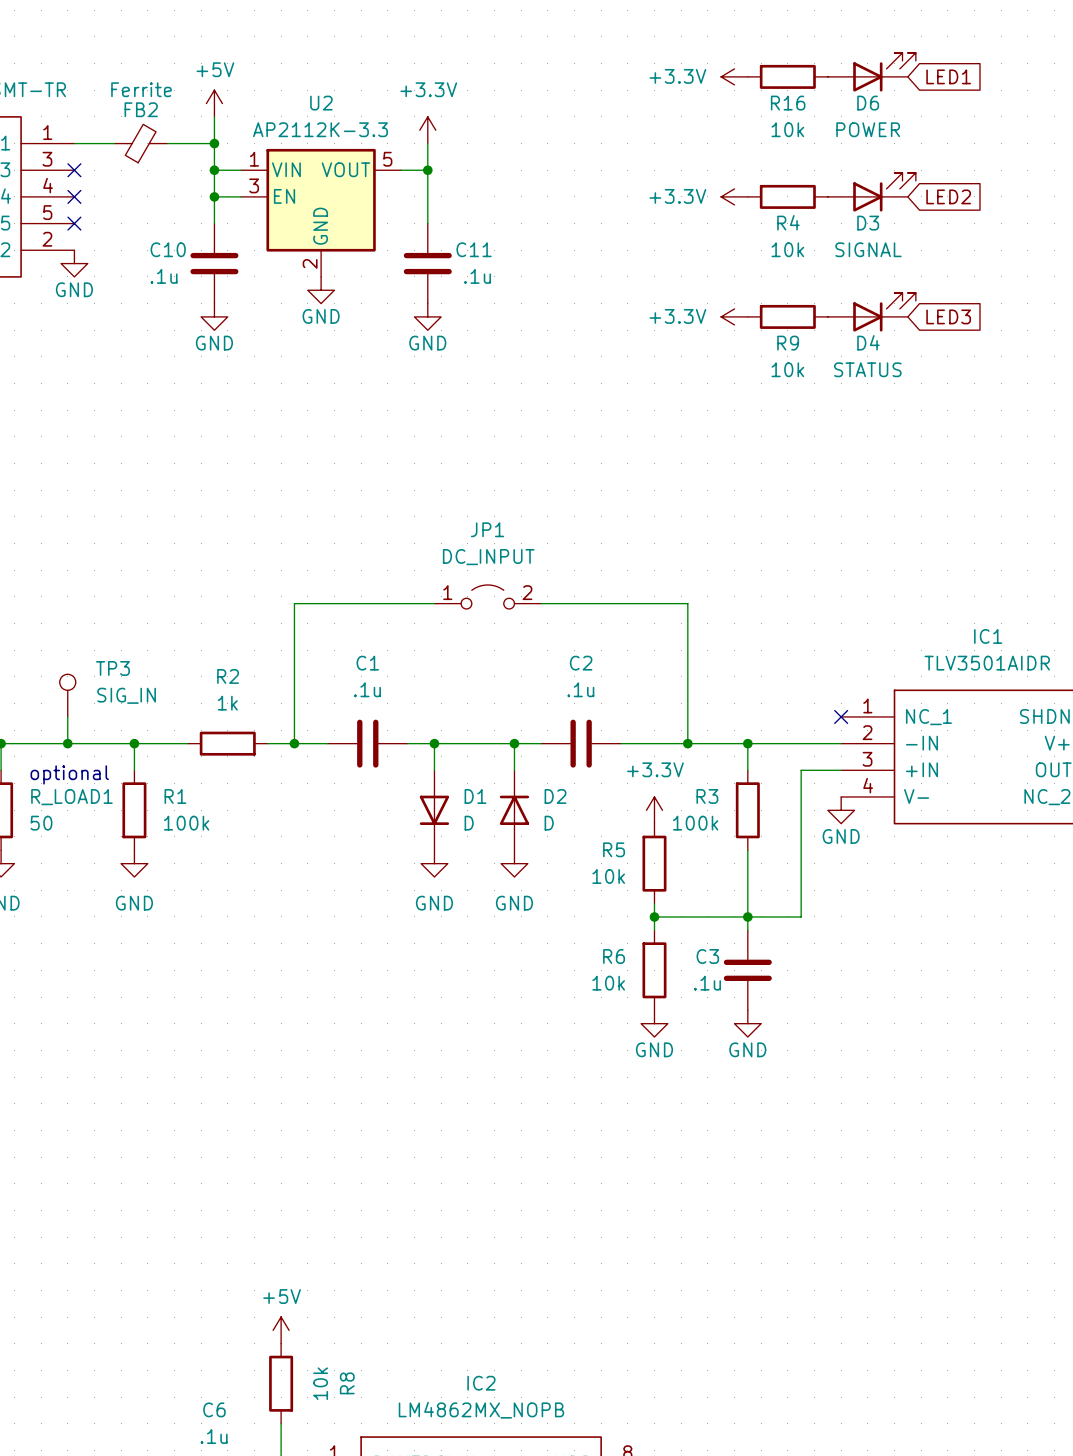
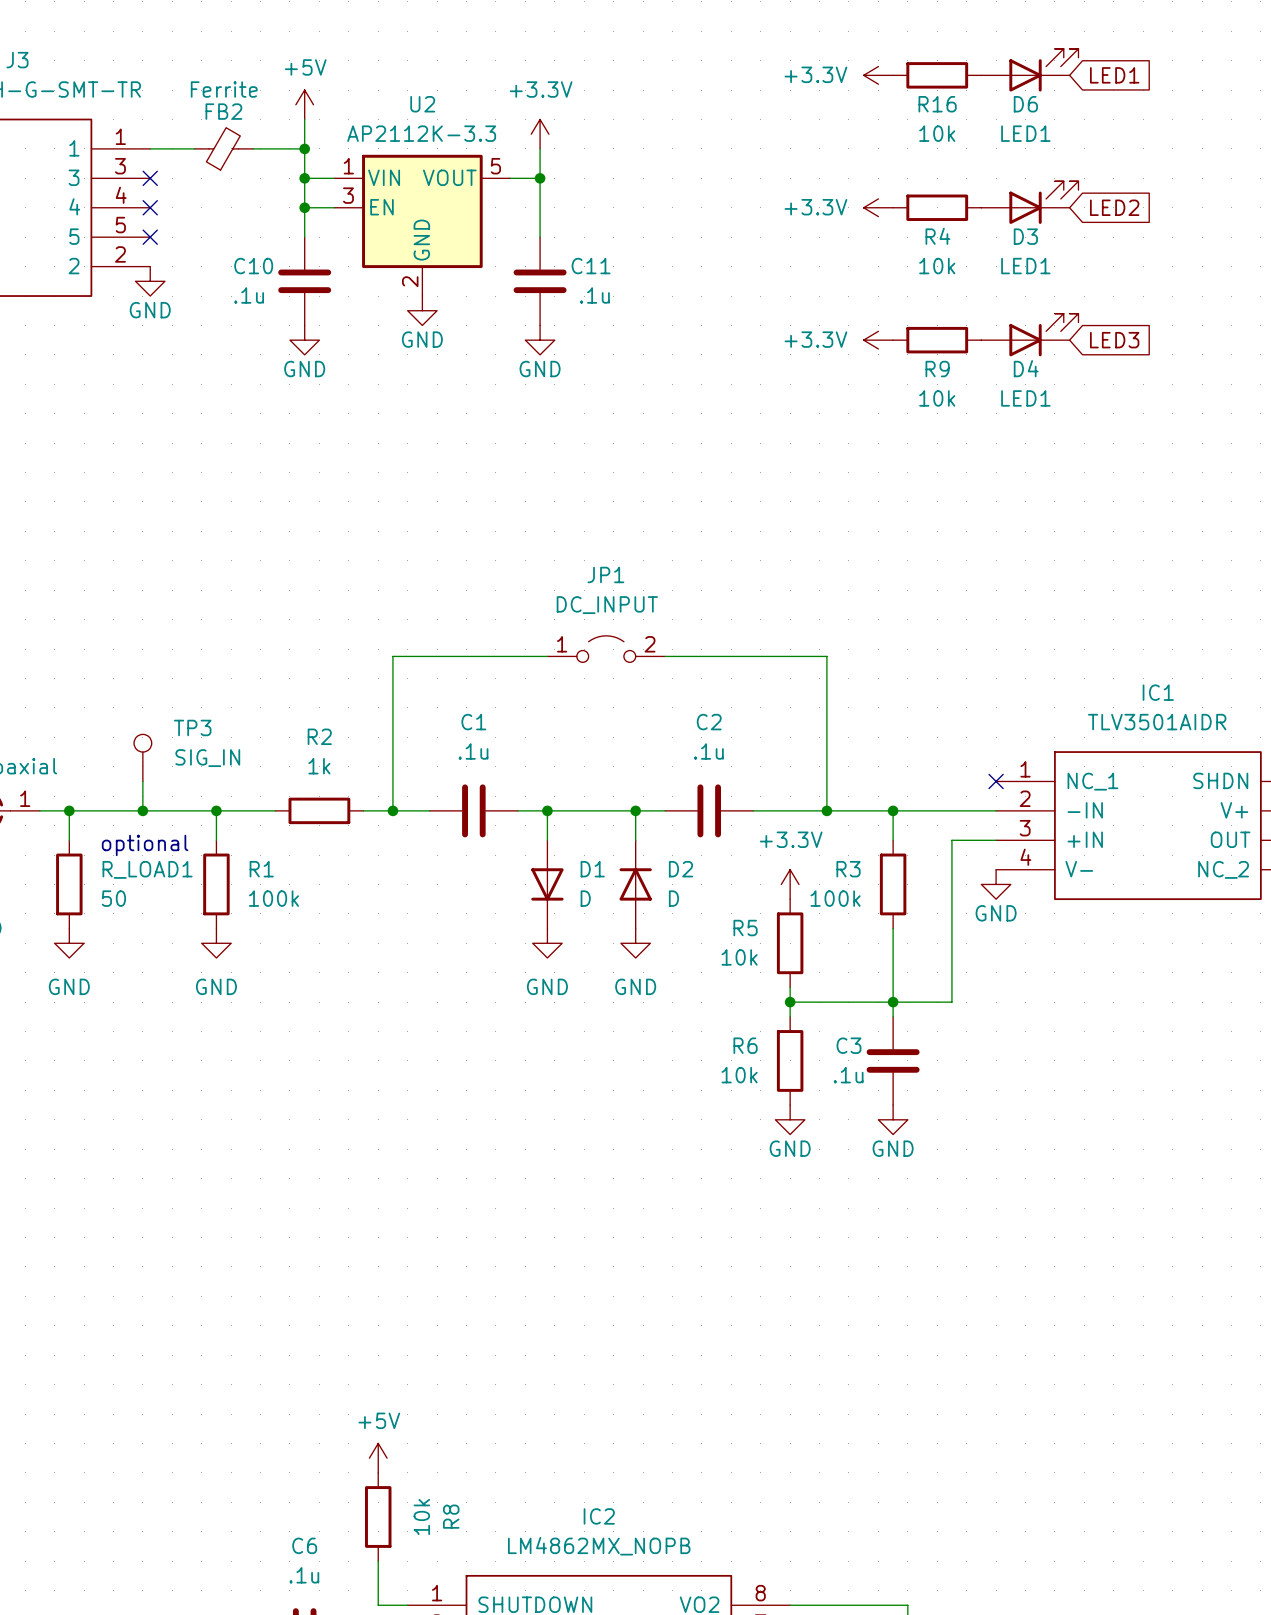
D6 value: POWER (868, 129) -> LED1 (1025, 133)
D3 value: SIGNAL (868, 249) -> LED1 (1025, 266)
D4 value: STATUS (867, 369) -> LED1 (1025, 398)

